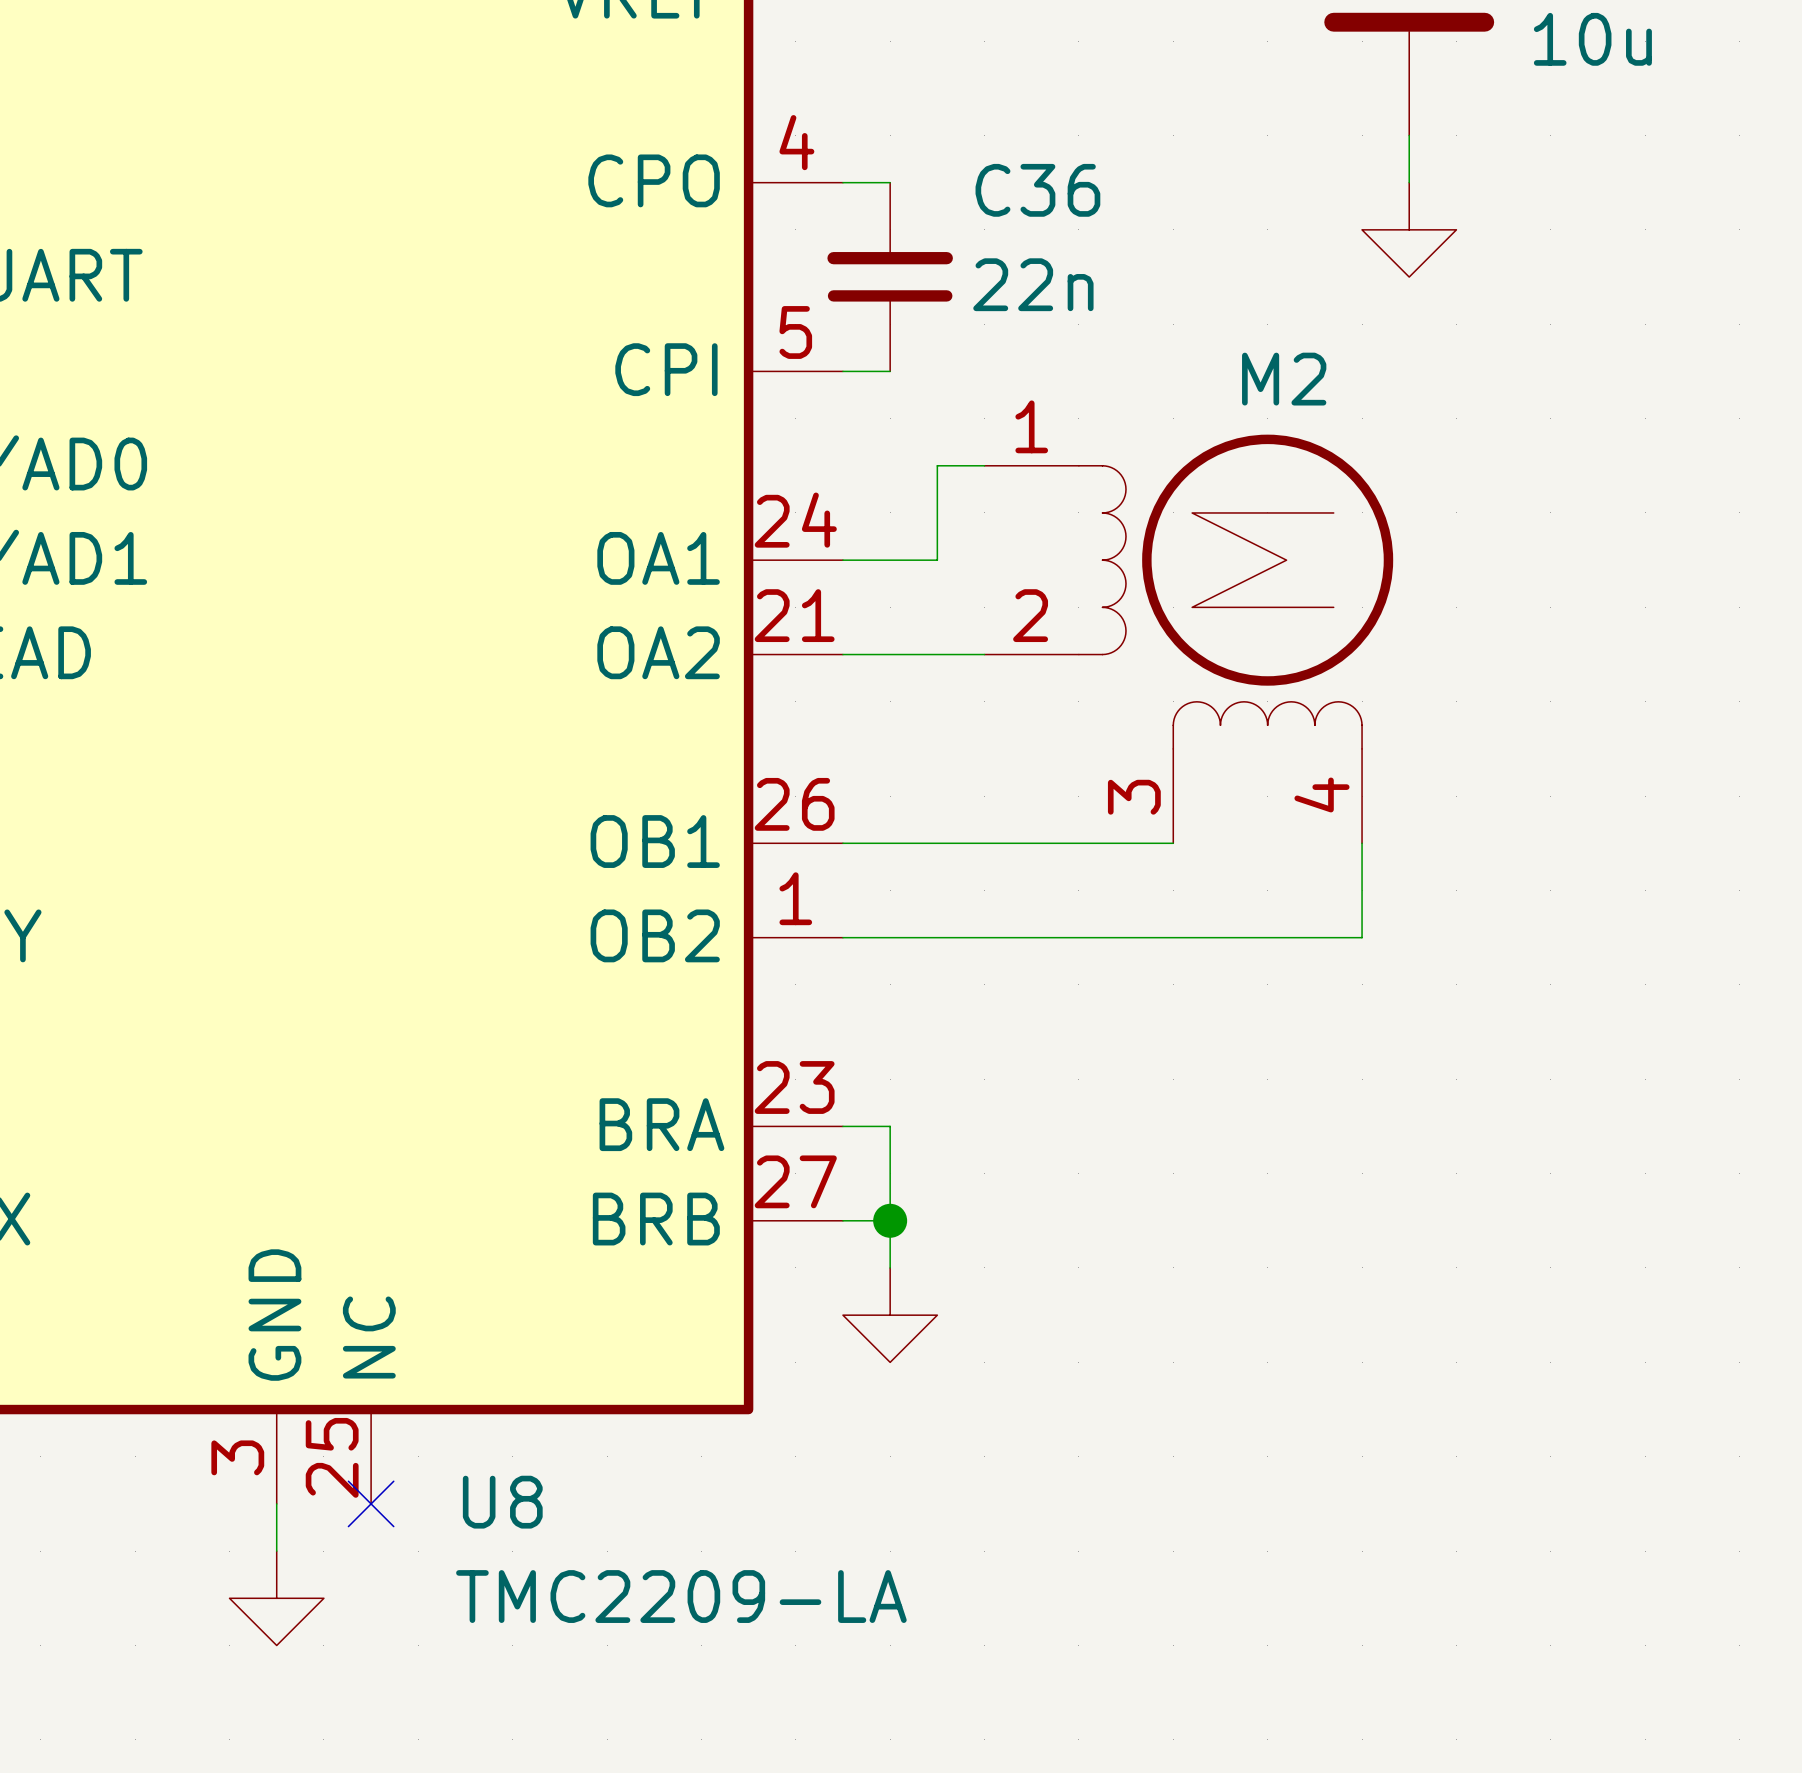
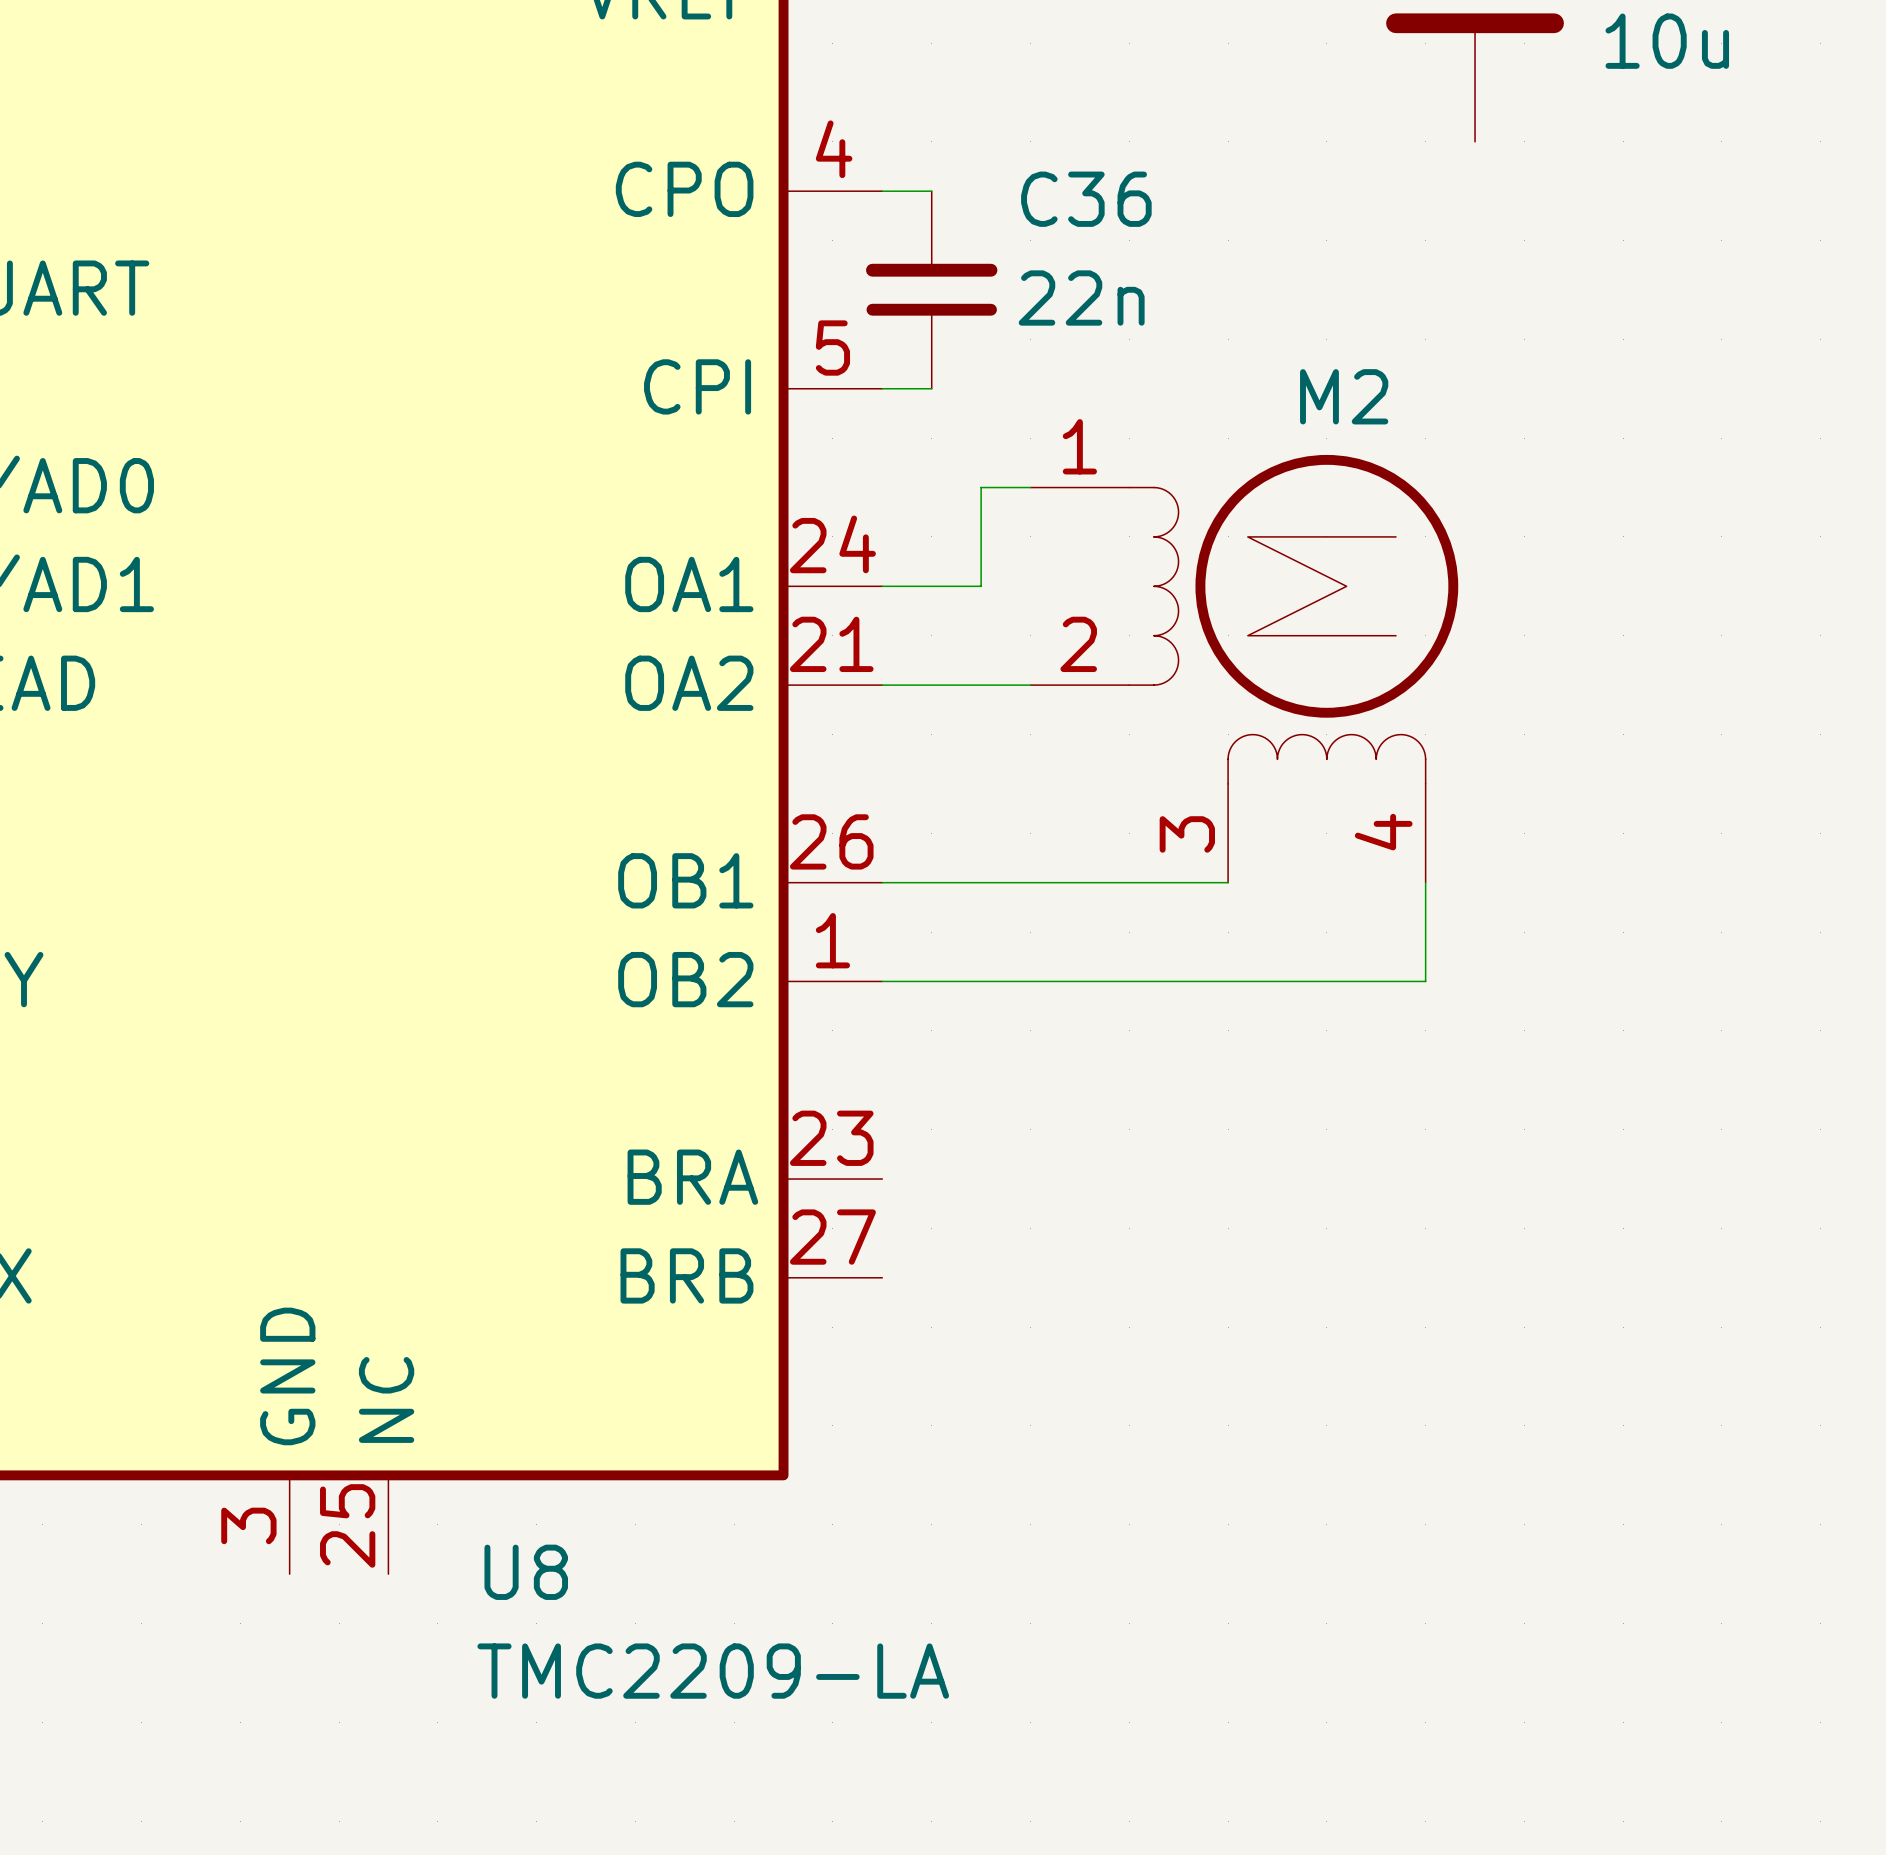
wire: (1409, 135) (1409, 182) -> none
power symbol: (1409, 229) -> none
wire: (842, 1126) (890, 1126) (890, 1267) -> none
wire: (842, 1220) (890, 1220) -> none
junction: (890, 1220) -> none
power symbol: (890, 1315) -> none
wire: (276, 1503) (276, 1551) -> none
no-connect mark: (371, 1503) -> none
power symbol: (276, 1598) -> none

